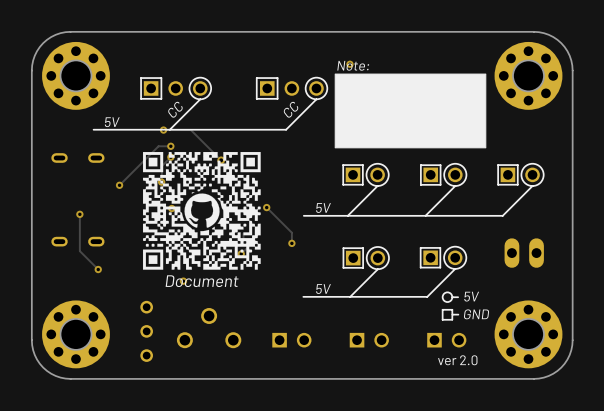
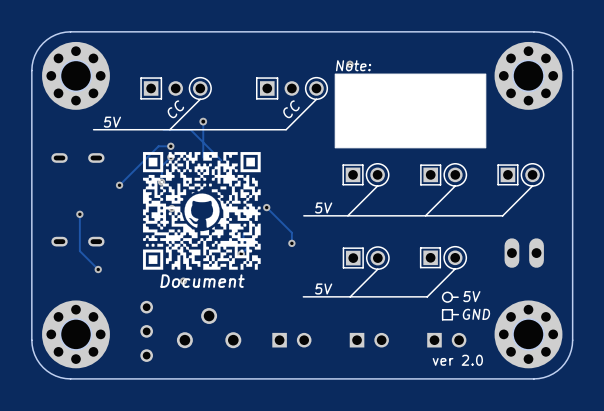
track: none -> (203, 121) (203, 157)
via: (163, 130) -> none
via position: (221, 160) -> (203, 121)

